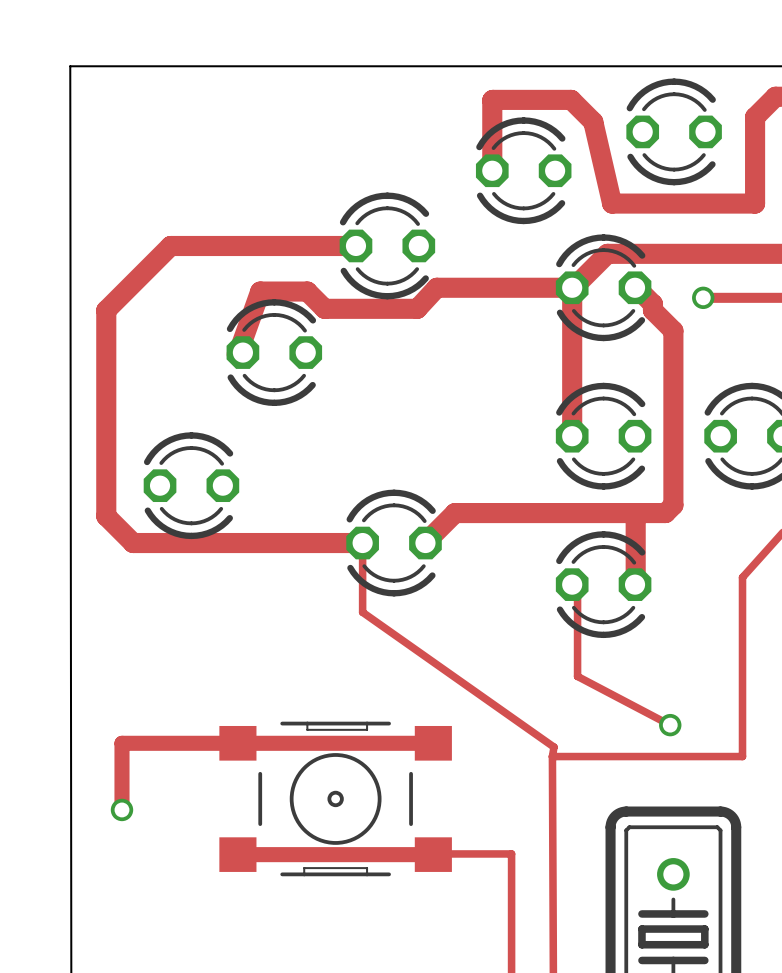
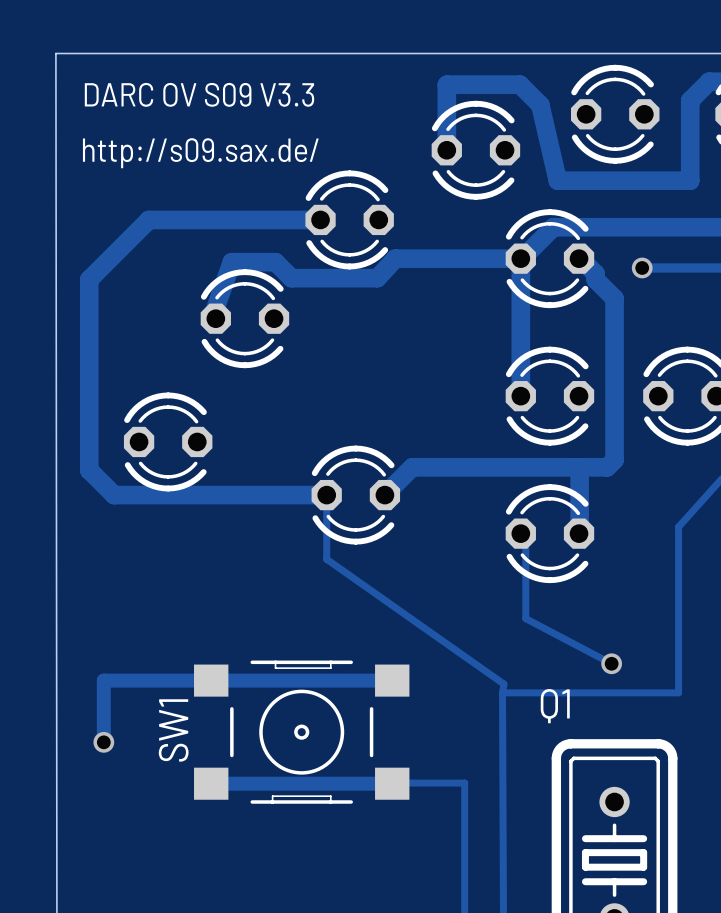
text: none -> DARC OV S09 V3.3 (199, 94)
text: none -> http://s09.sax.de/ (200, 153)
Q1 name: none -> Q1 (555, 706)
SW1 name: none -> SW1 (173, 730)

